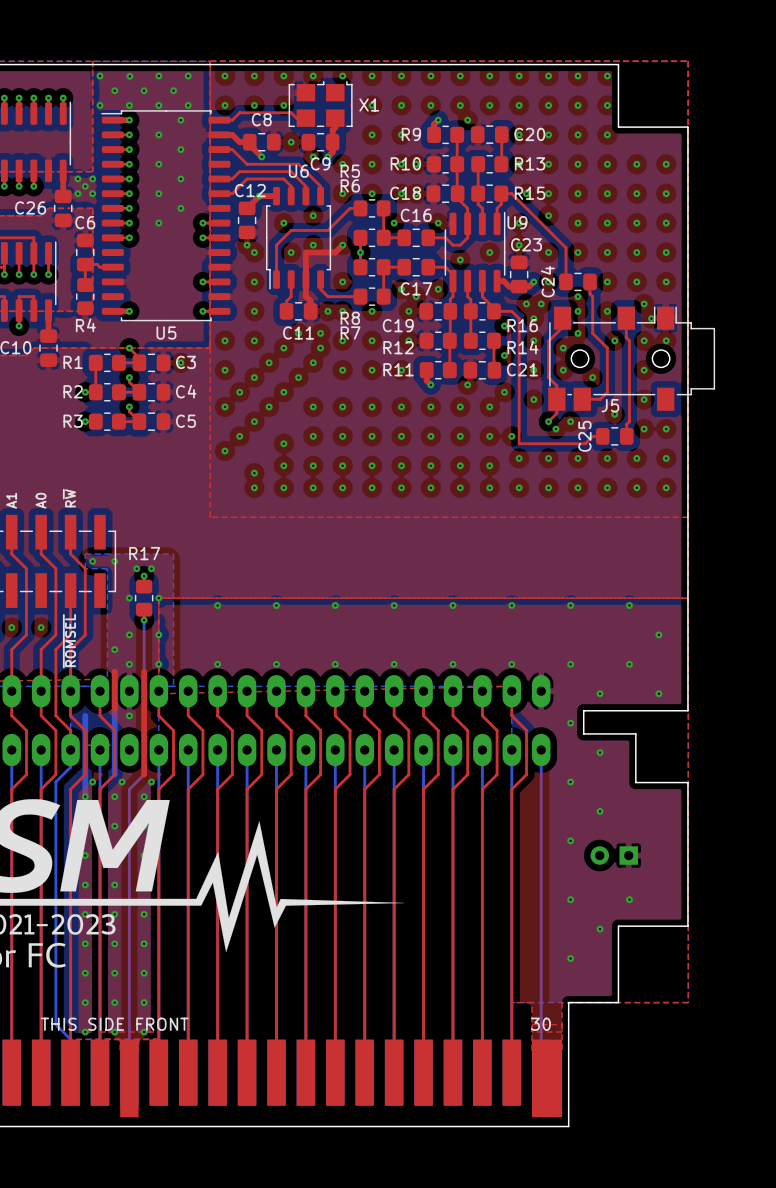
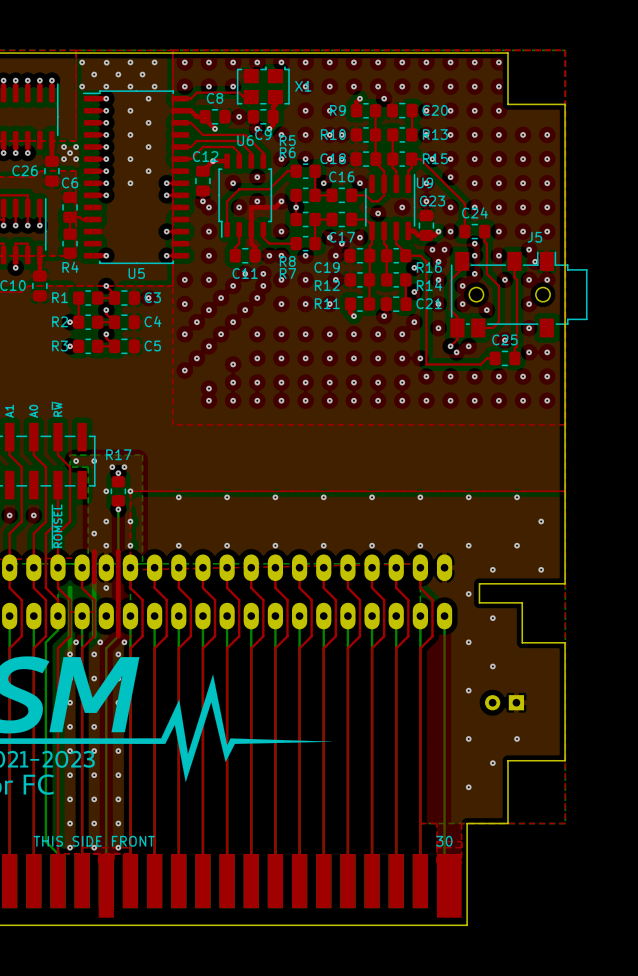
C24 name rotation: 0° (547, 281) -> 90° clockwise (474, 212)
J5 name position: J5 (610, 405) -> J5 (534, 237)
C25 name rotation: 0° (584, 436) -> 90° clockwise (504, 339)

